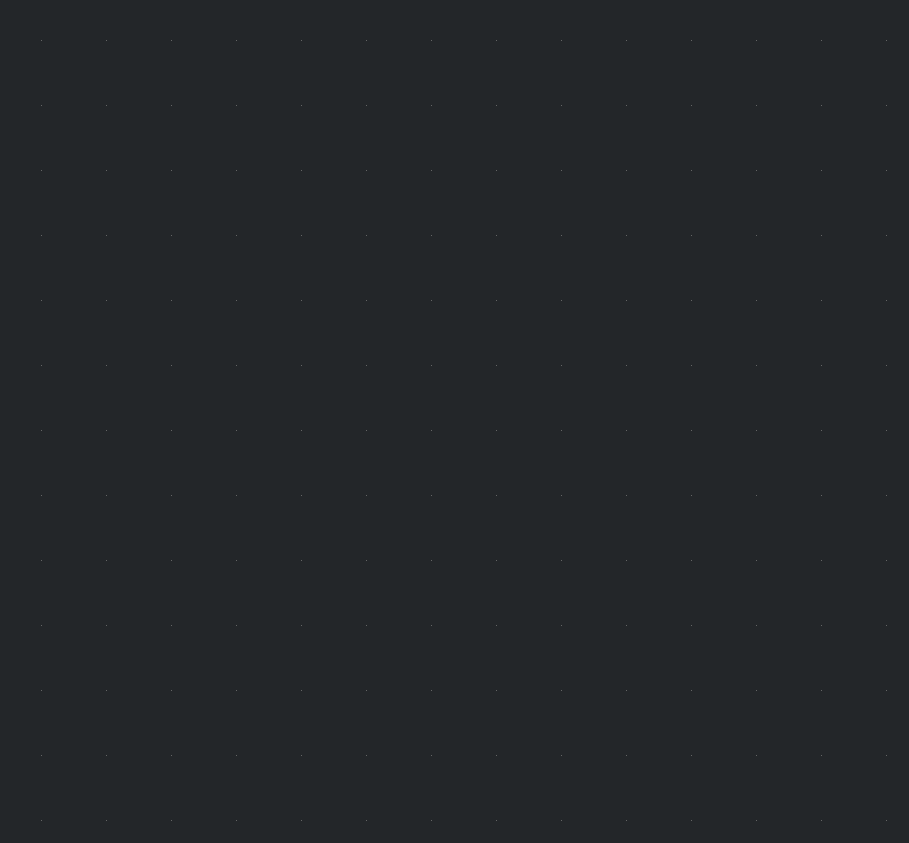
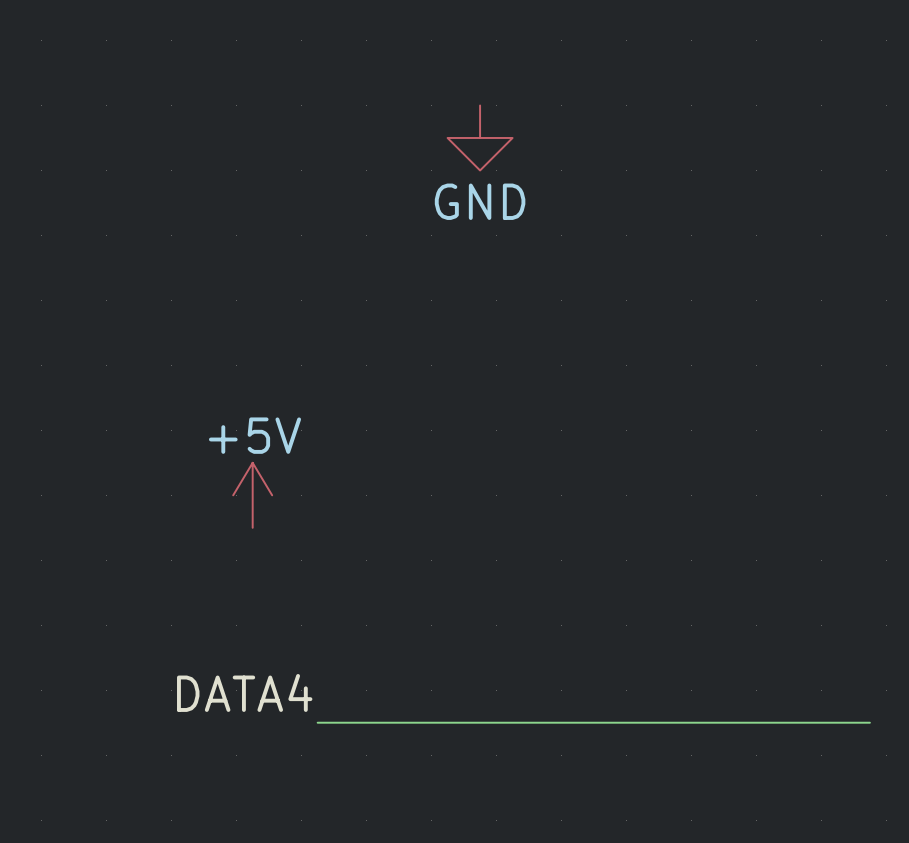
power symbol: none -> GND (480, 137)
power symbol: none -> +5V (252, 495)
label: none -> DATA4 (244, 692)
wire: none -> (317, 722) (869, 722)

